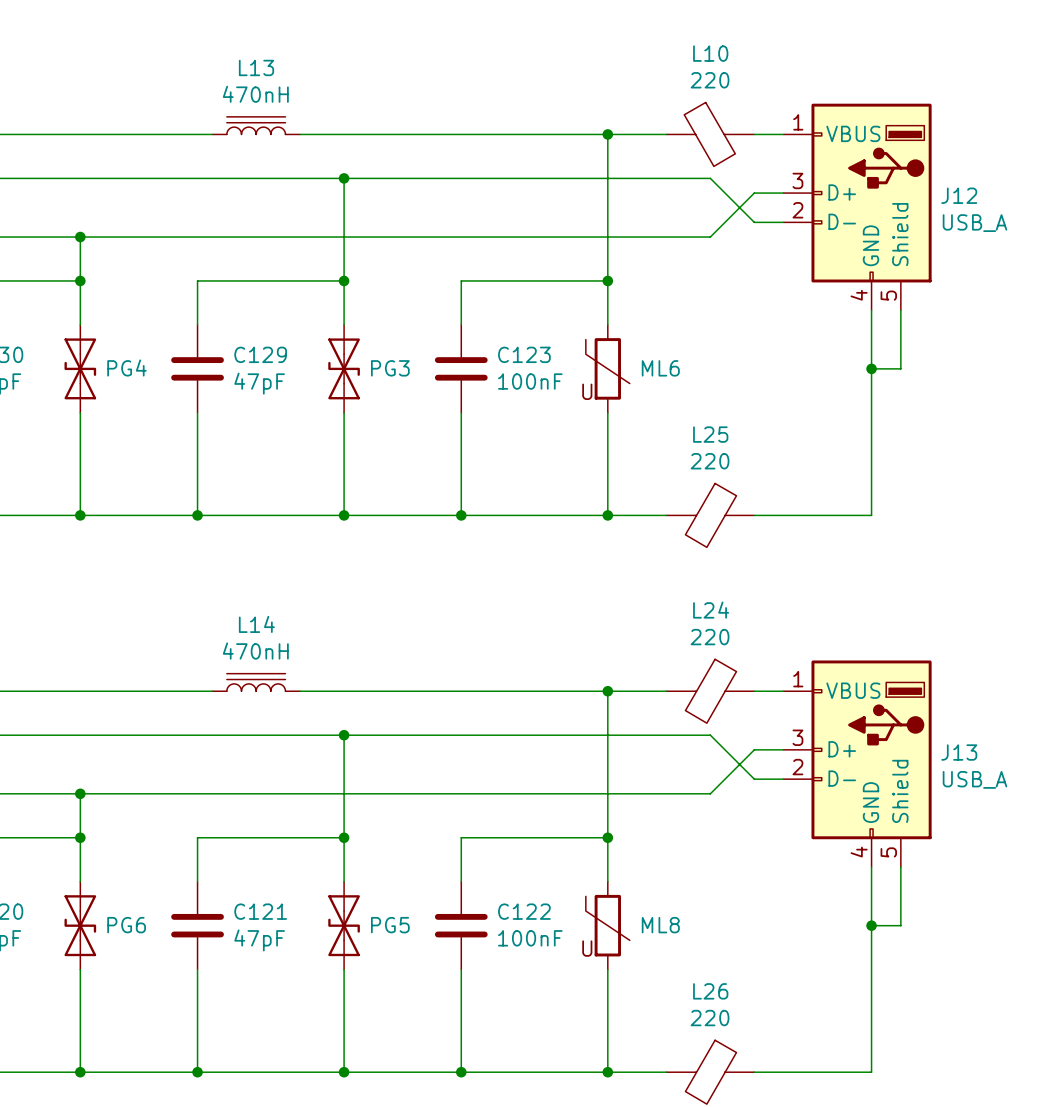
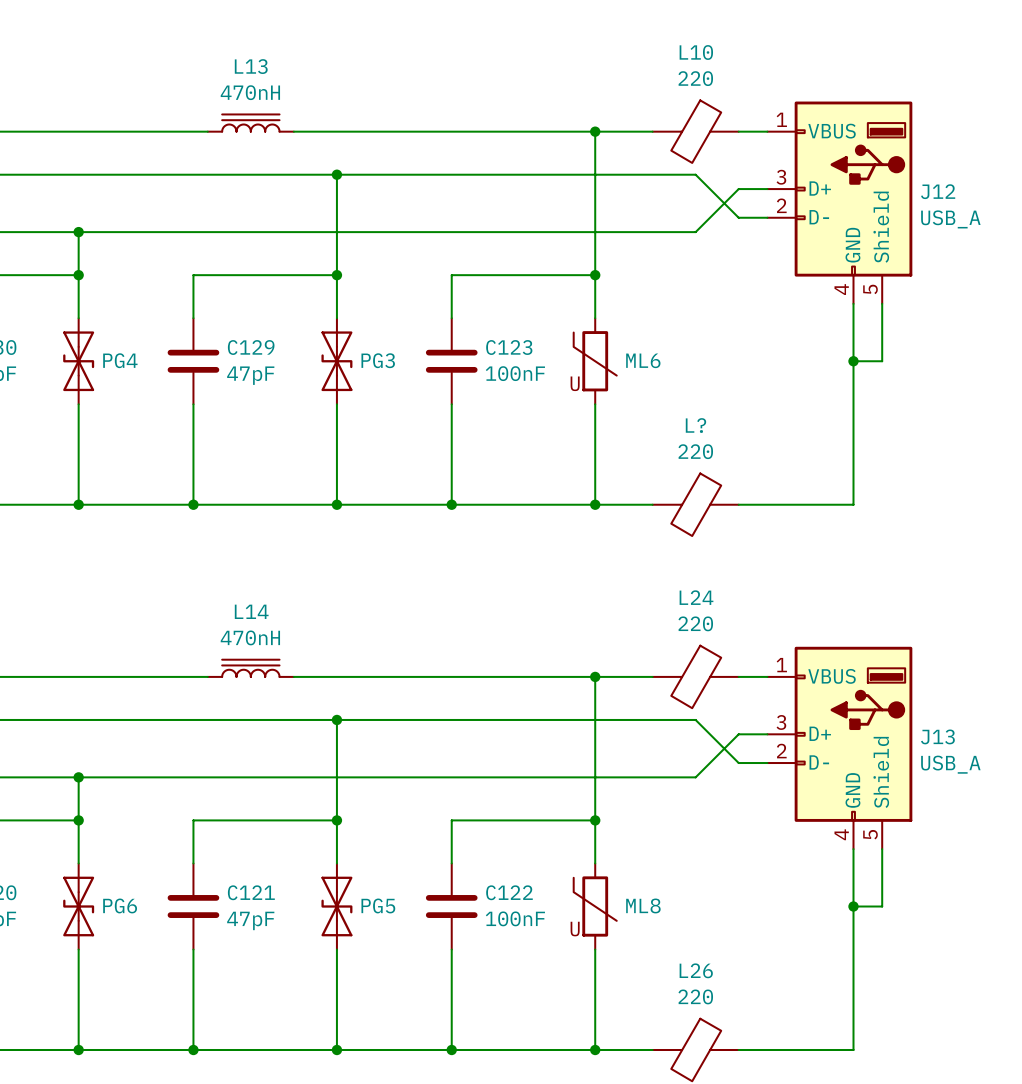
L10 flip: as is (709, 134) -> left-right (696, 131)
L25 name: L25 (710, 434) -> L? (695, 425)

